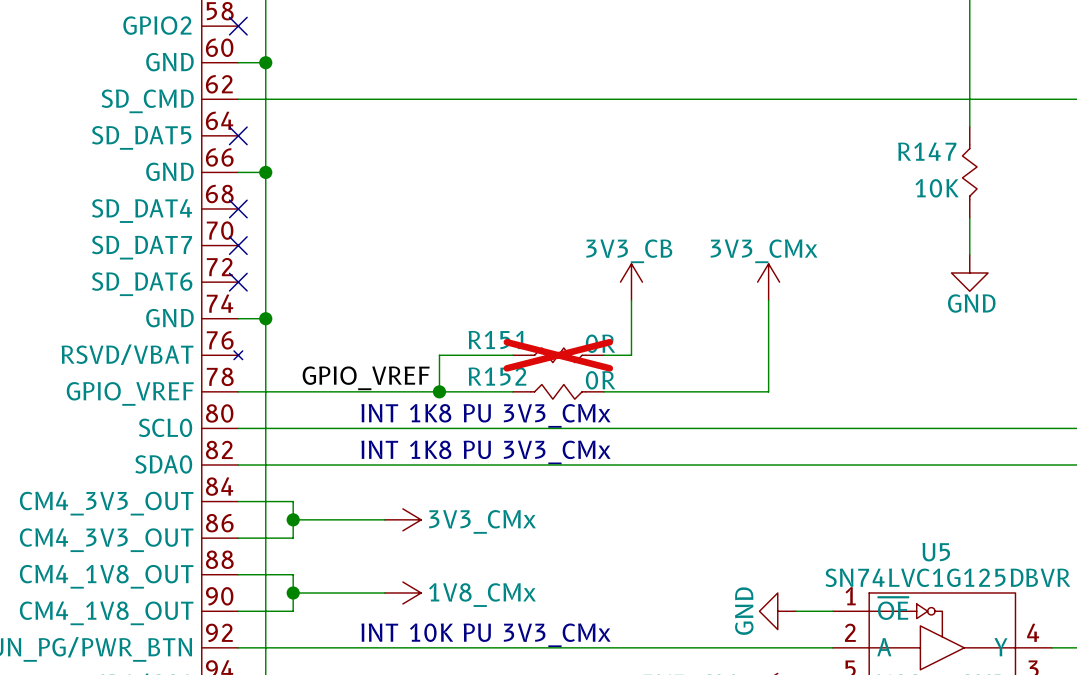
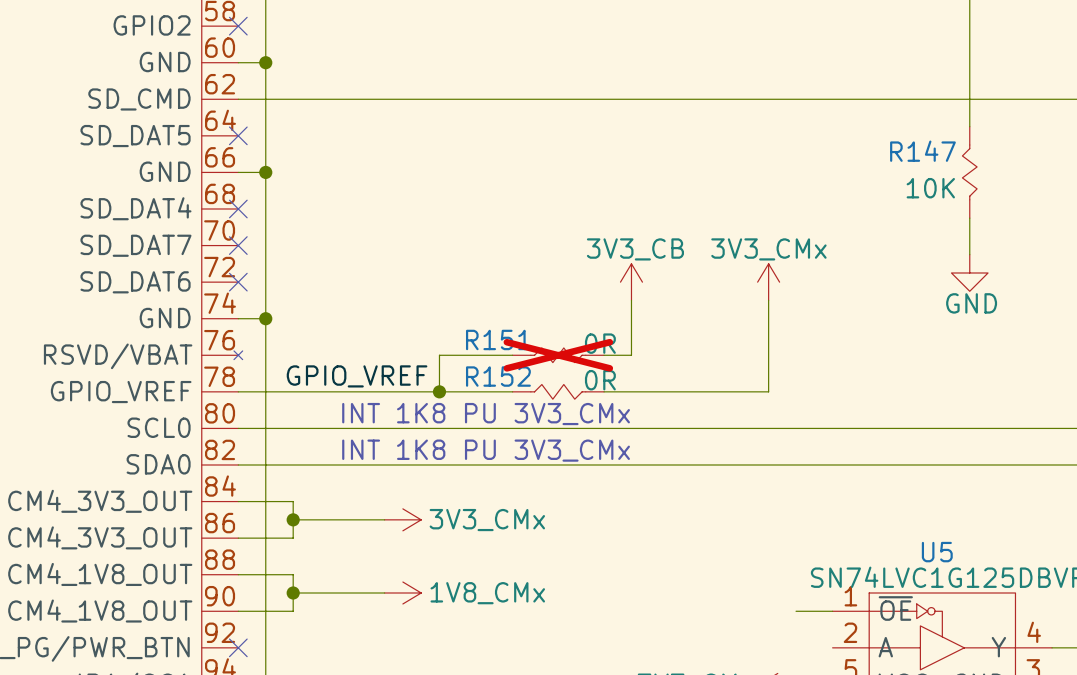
power symbol: GND (777, 611) -> none
text: INT 10K PU 3V3_CMx (486, 635) -> none
wire: (238, 647) (832, 647) -> none
no-connect mark: none -> (238, 647)

